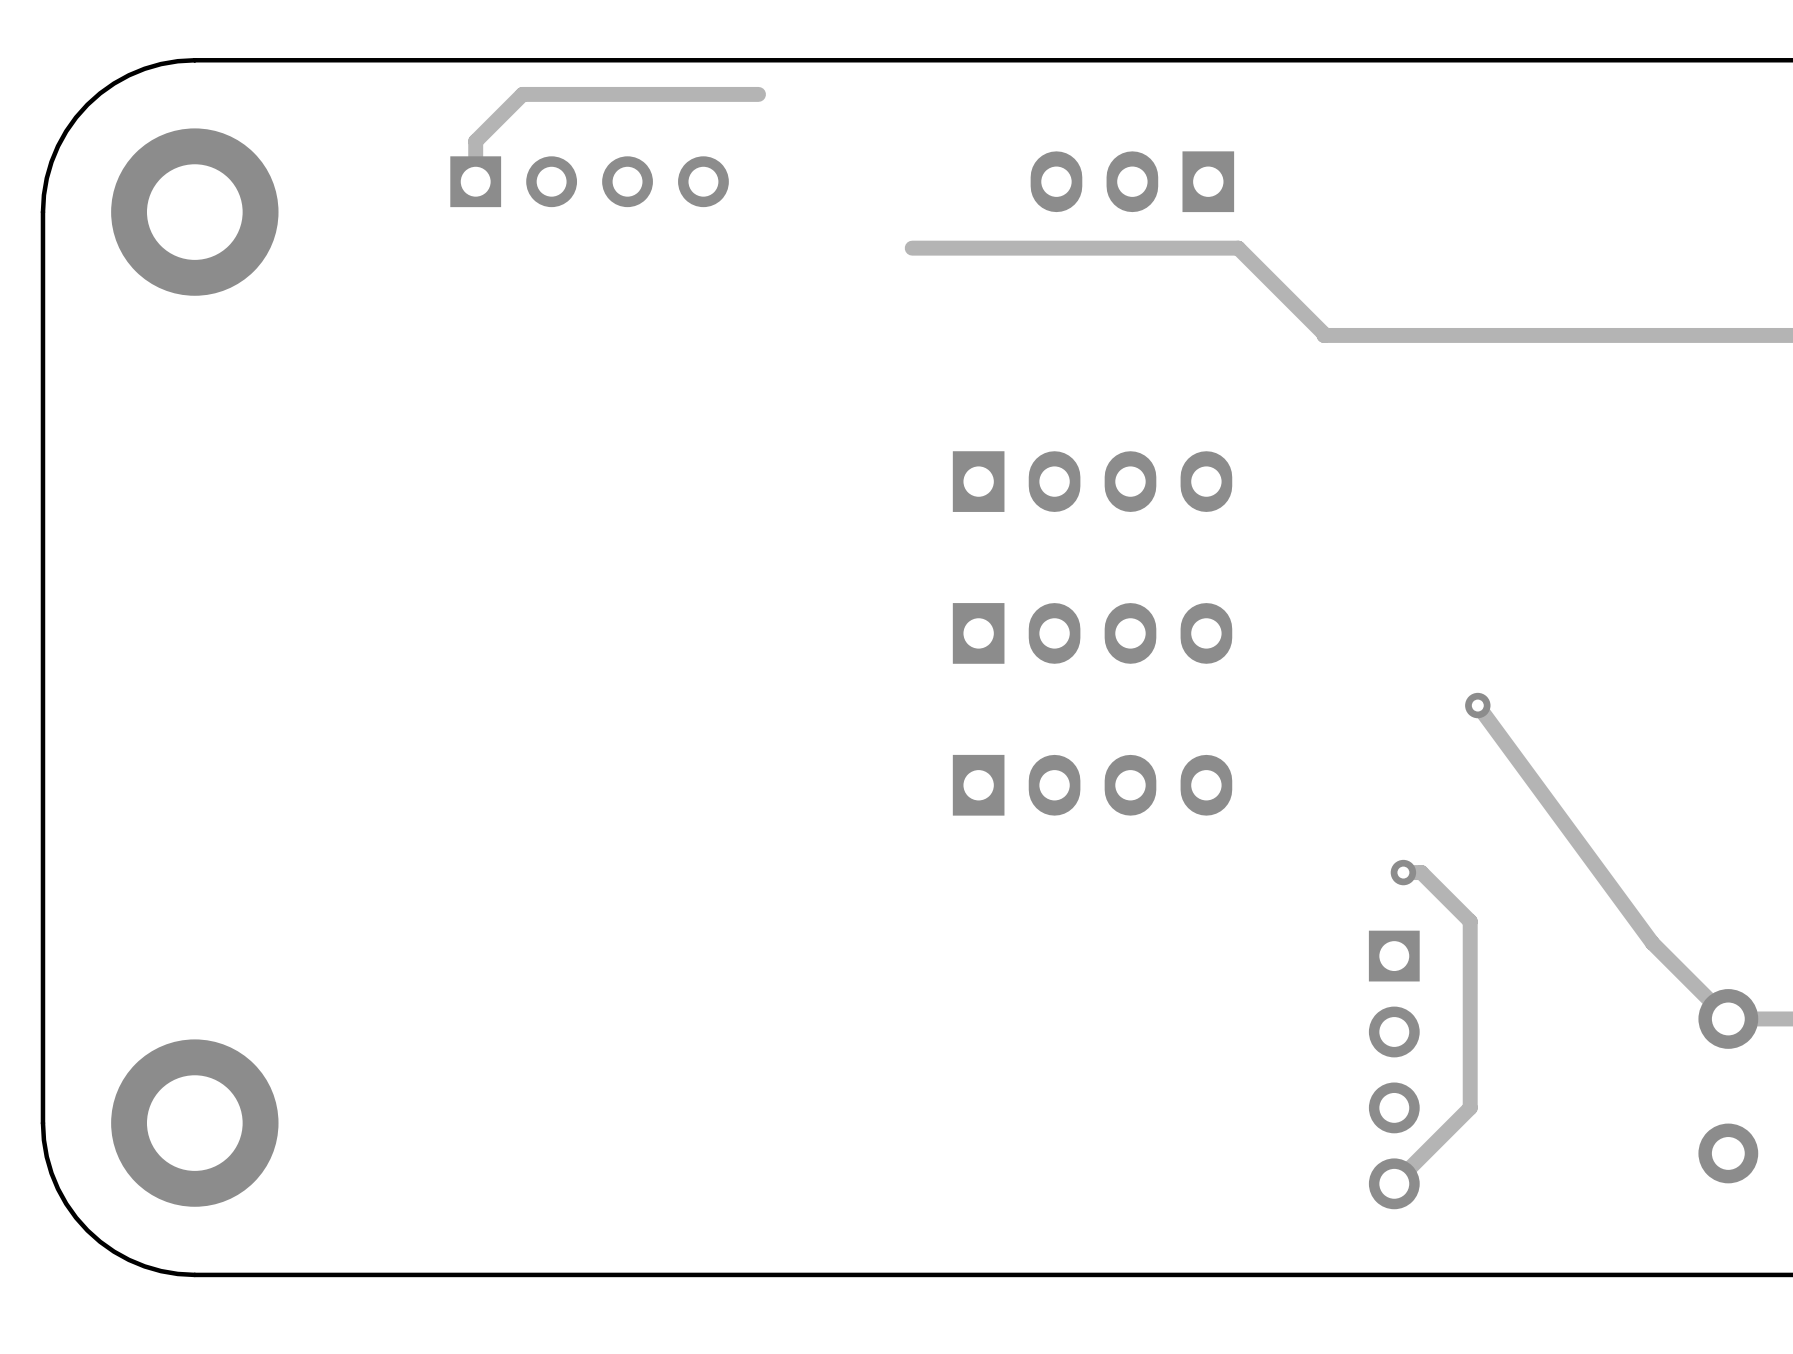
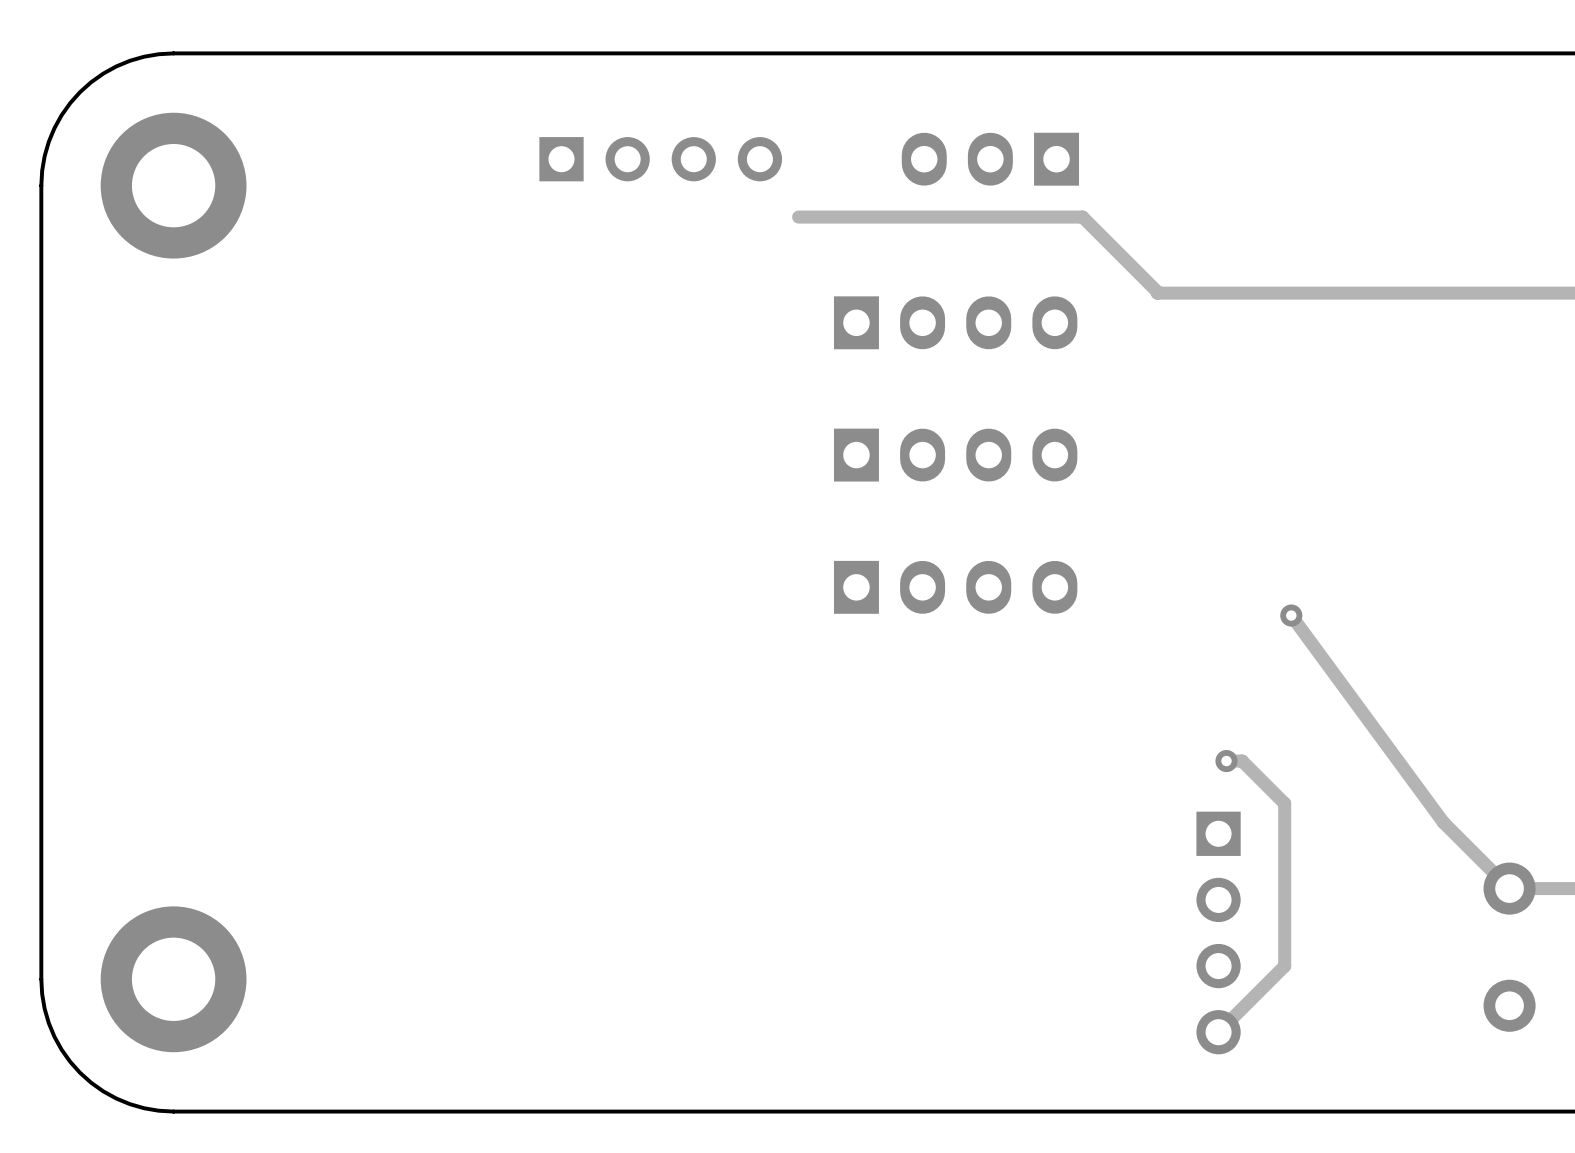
track: (758, 94) (522, 94) (475, 141) (475, 181) -> none
part position: (589, 181) -> (660, 159)
part: none -> (955, 322)
part position: (1092, 481) -> (955, 455)
part position: (1092, 633) -> (955, 587)
part: (1092, 785) -> none

